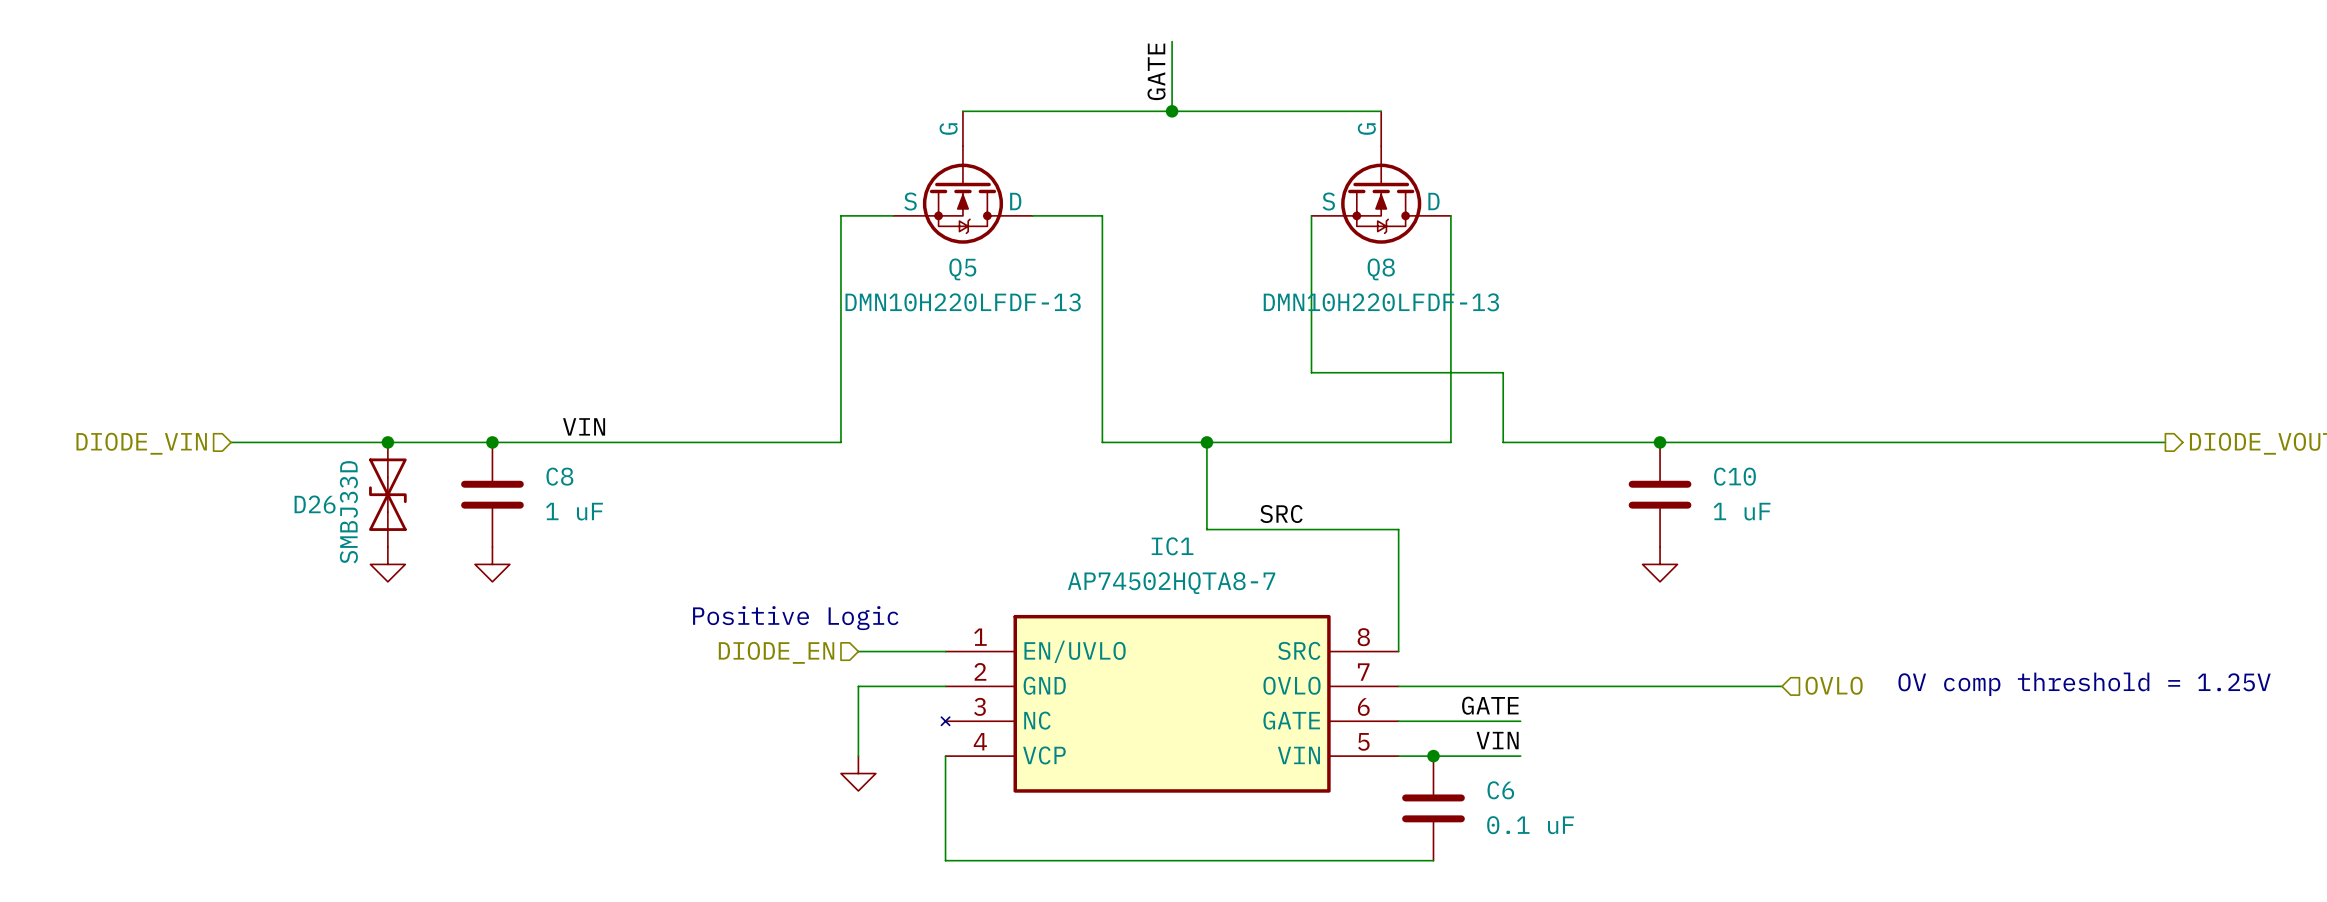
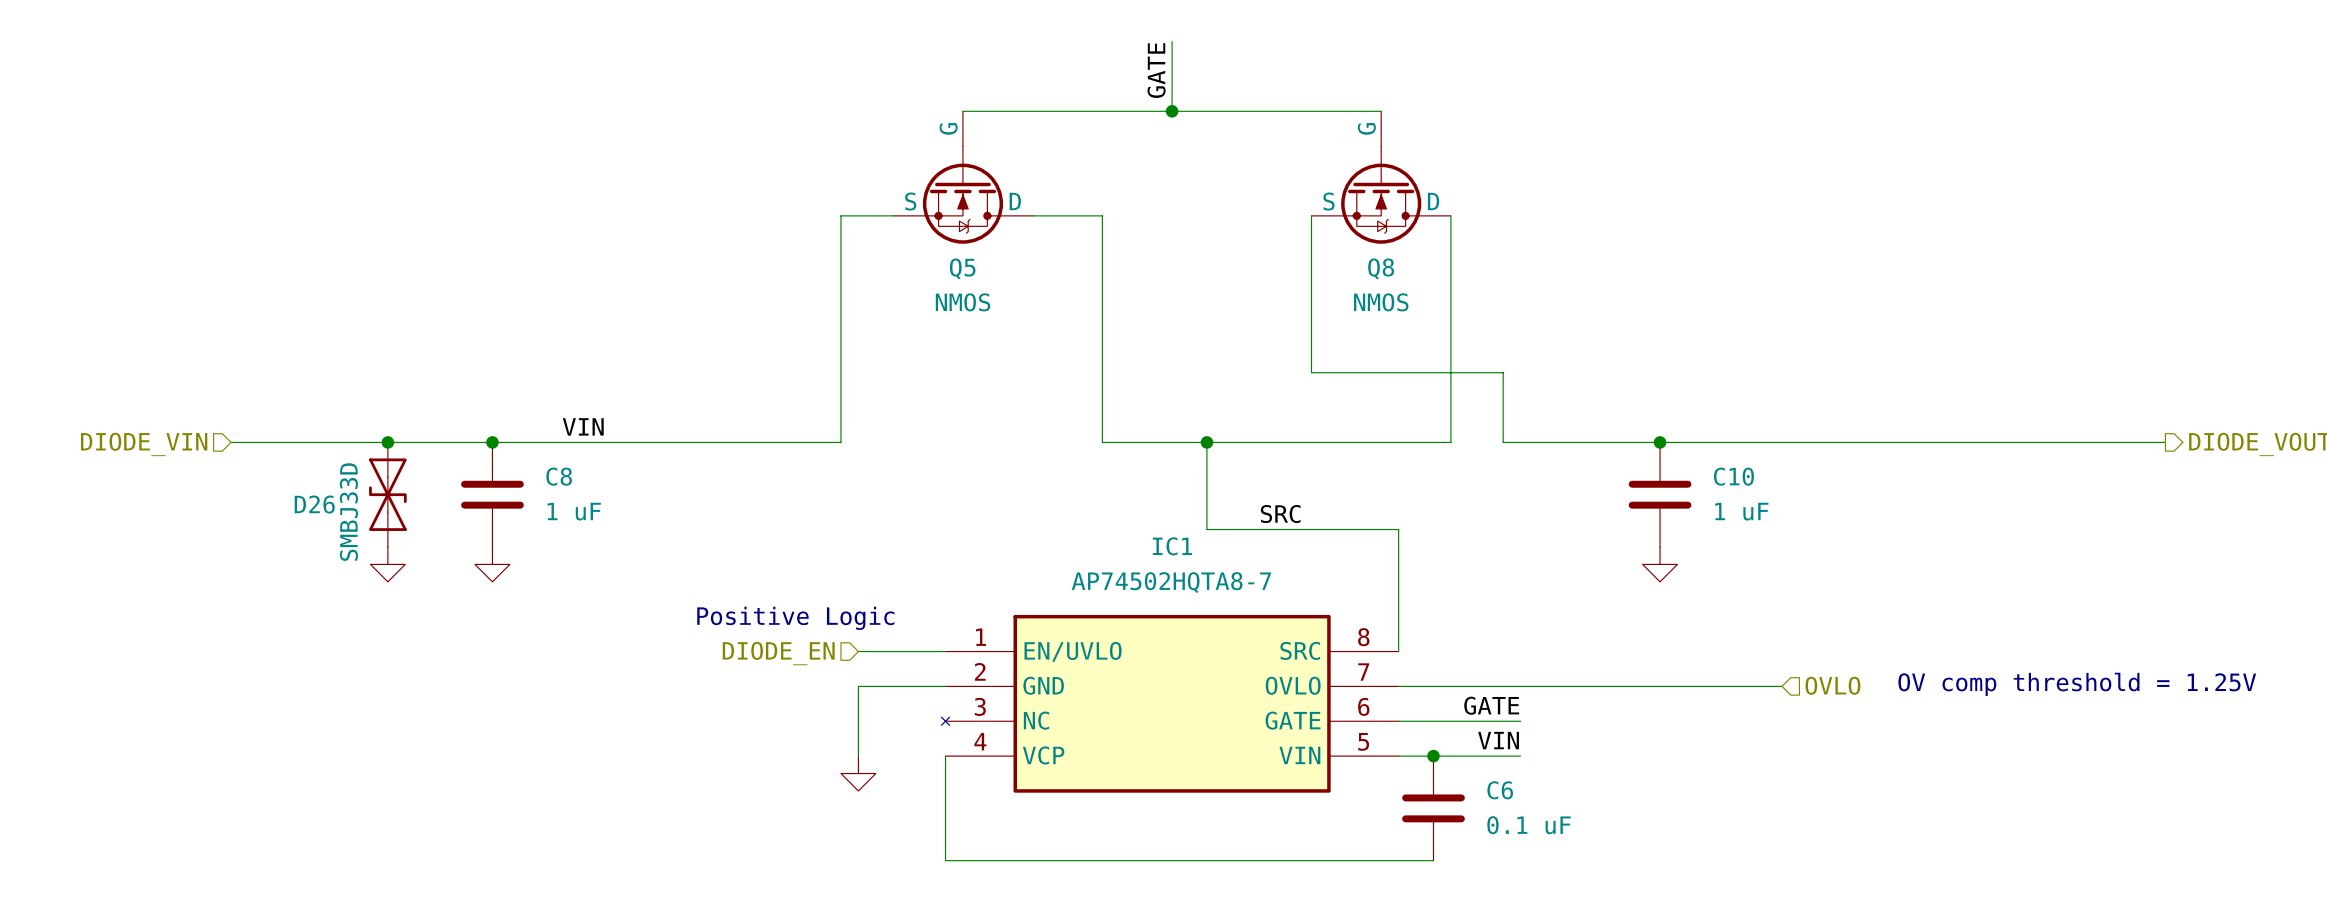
Q5 value: DMN10H220LFDF-13 (963, 302) -> NMOS (962, 302)
Q8 value: DMN10H220LFDF-13 (1381, 302) -> NMOS (1381, 302)

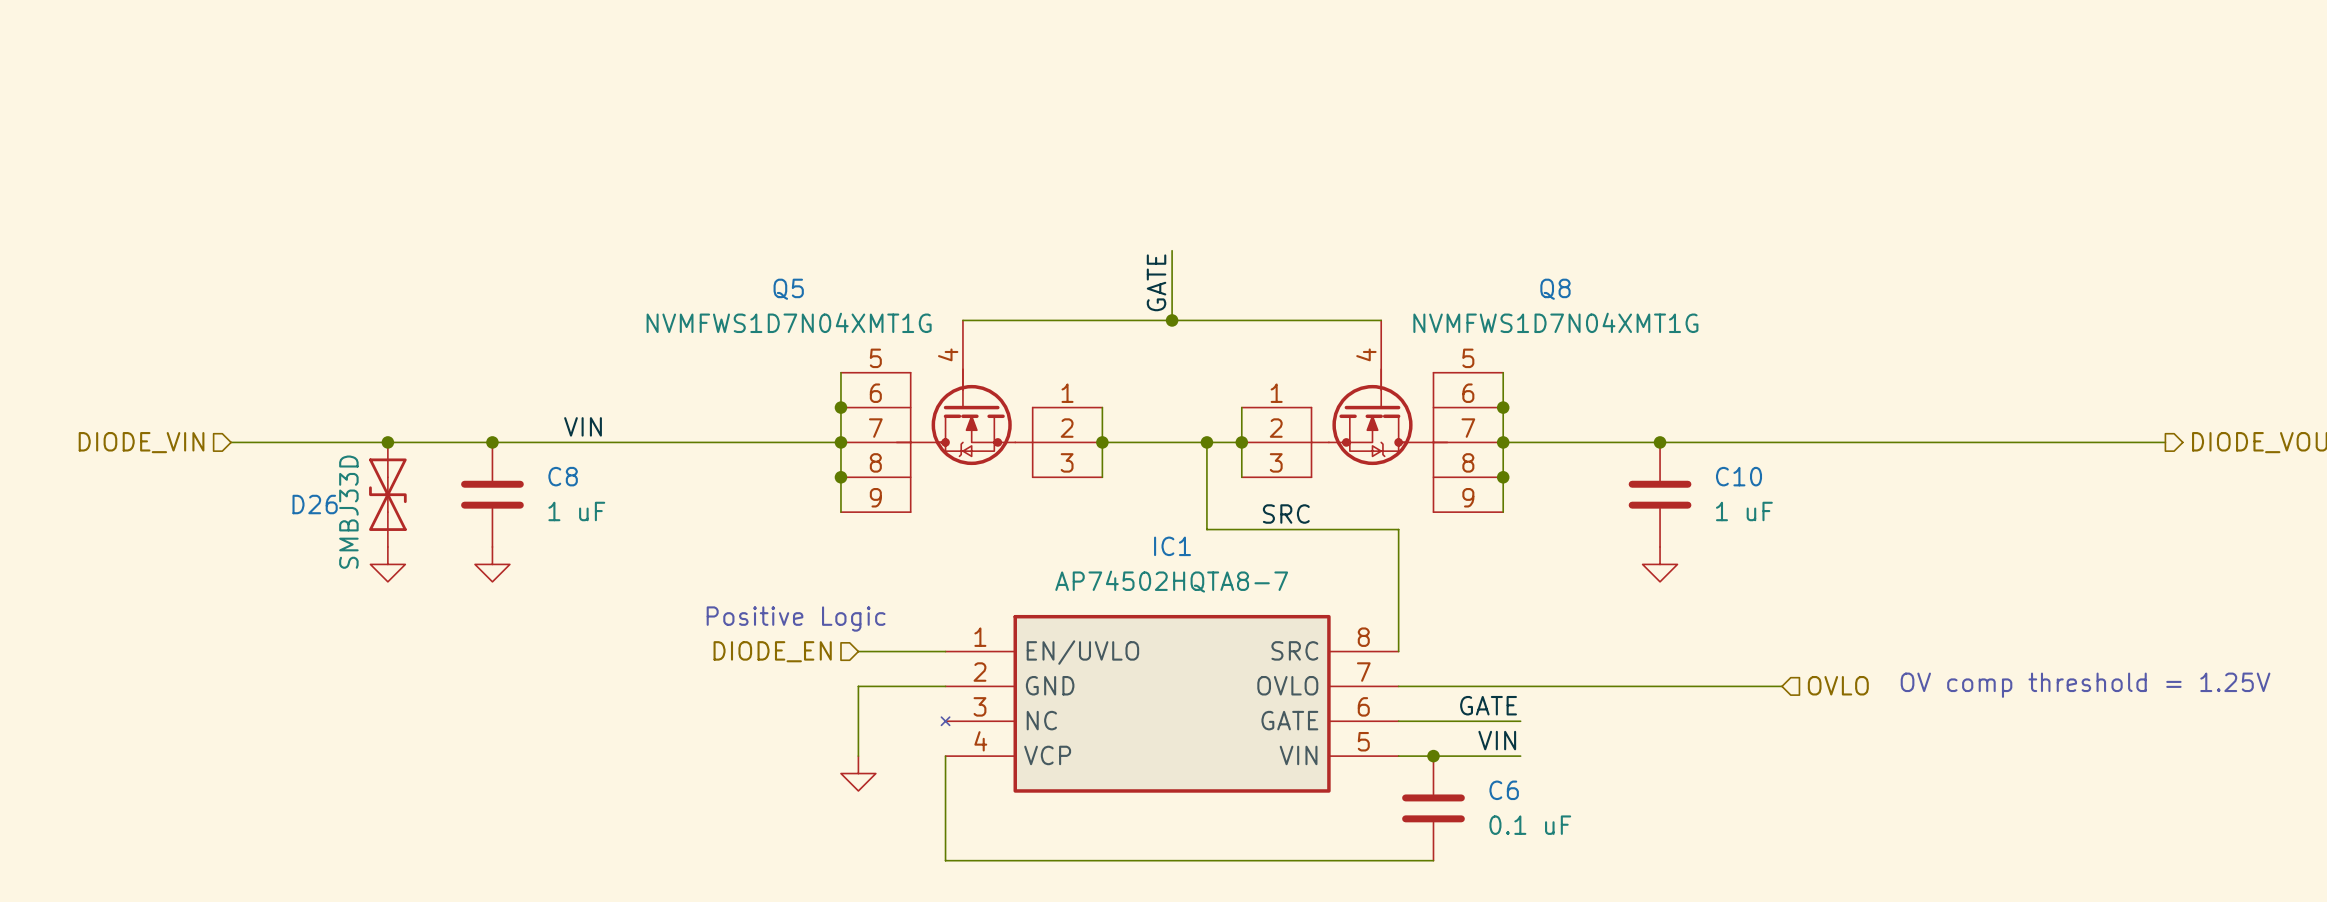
wire: (1172, 41) (1172, 111) -> (1172, 250) (1172, 320)
label position: GATE (1156, 70) -> GATE (1156, 282)
Q5 symbol: [893, 111, 1033, 244] -> [840, 320, 1103, 513]
wire: (962, 111) (1381, 111) -> (962, 320) (1381, 320)
junction: (1172, 111) -> none
Q8 symbol: [1311, 111, 1451, 244] -> [1241, 320, 1504, 513]
wire: (893, 215) (840, 215) (840, 372) -> none
wire: (1032, 215) (1102, 215) (1102, 407) -> none
wire: (1311, 215) (1311, 372) (1503, 372) -> none
wire: (1450, 215) (1450, 442) (1241, 442) -> none
Q5 name position: Q5 (962, 268) -> Q5 (788, 289)
Q8 name position: Q8 (1381, 268) -> Q8 (1555, 289)
Q5 value: NMOS (962, 302) -> NVMFWS1D7N04XMT1G (789, 322)
Q8 value: NMOS (1381, 302) -> NVMFWS1D7N04XMT1G (1555, 322)
junction: none -> (1172, 320)
junction: none -> (840, 407)
wire: none -> (1241, 407) (1241, 477)
junction: none -> (1503, 407)
wire: none -> (840, 442) (840, 512)
junction: none -> (840, 442)
wire: none -> (1102, 442) (1102, 477)
junction: none -> (1102, 442)
junction: none -> (1241, 442)
wire: none -> (1503, 442) (1503, 512)
junction: none -> (1503, 442)
junction: none -> (840, 477)
junction: none -> (1503, 477)

